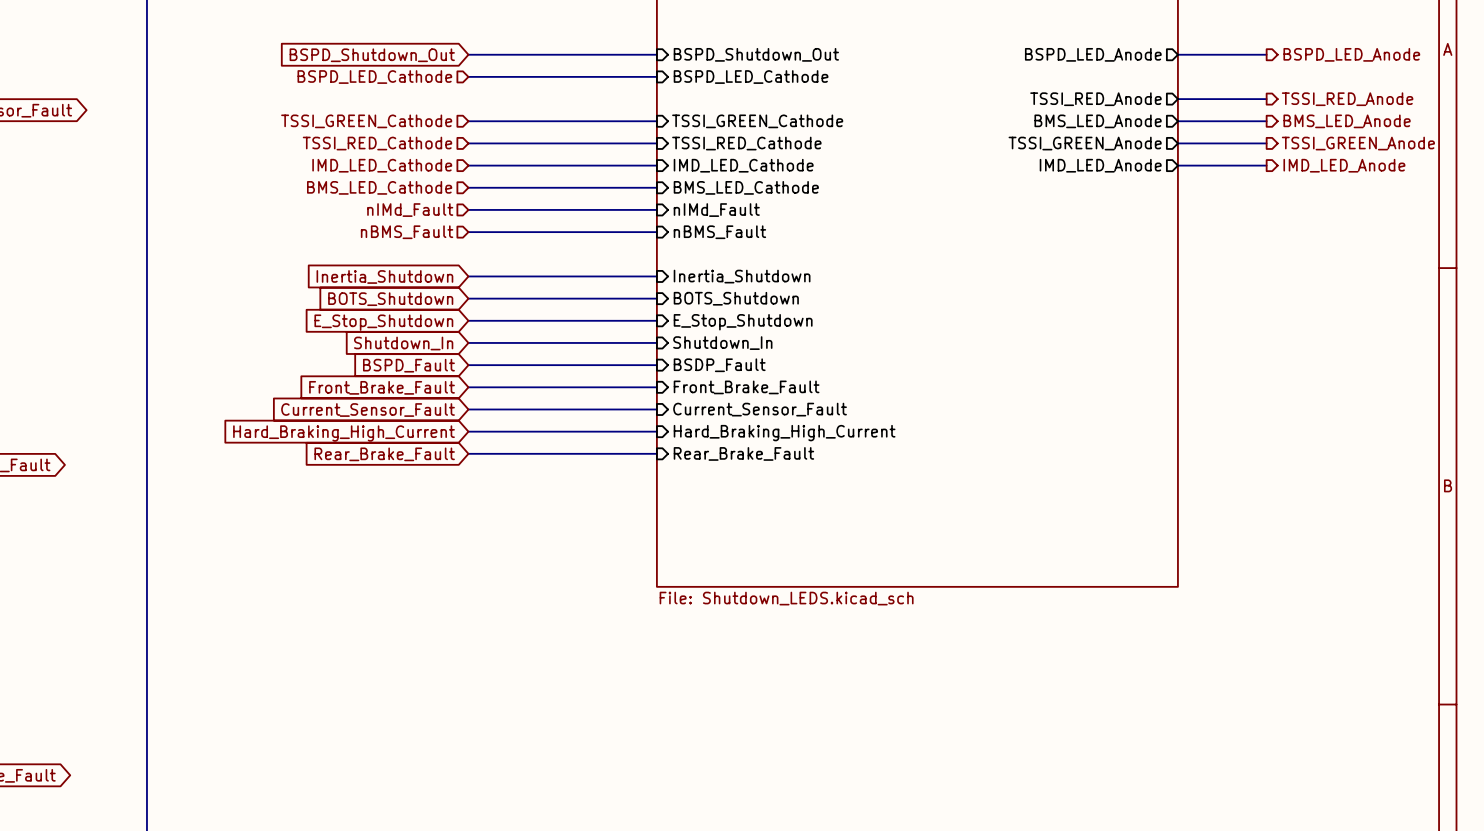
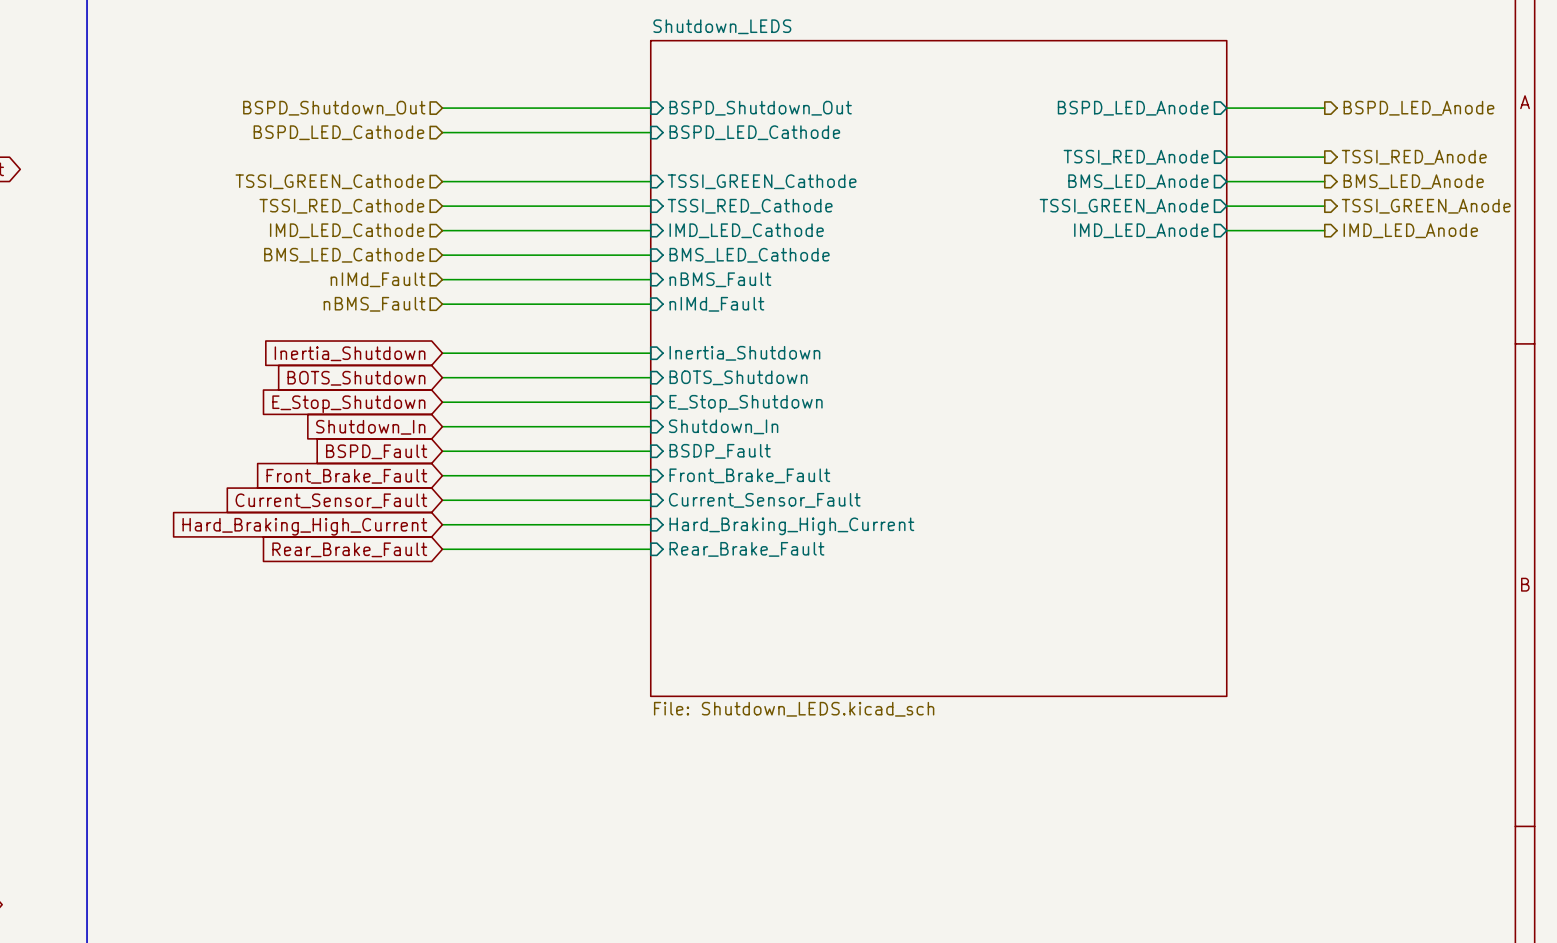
hierarchical label: none -> BSPD_Shutdown_Out (334, 108)
global label: BSPD_Shutdown_Out (372, 55) -> none
sheet pin: nIMd_Fault (716, 210) -> nBMS_Fault (720, 279)
sheet pin: nBMS_Fault (719, 232) -> nIMd_Fault (716, 304)

